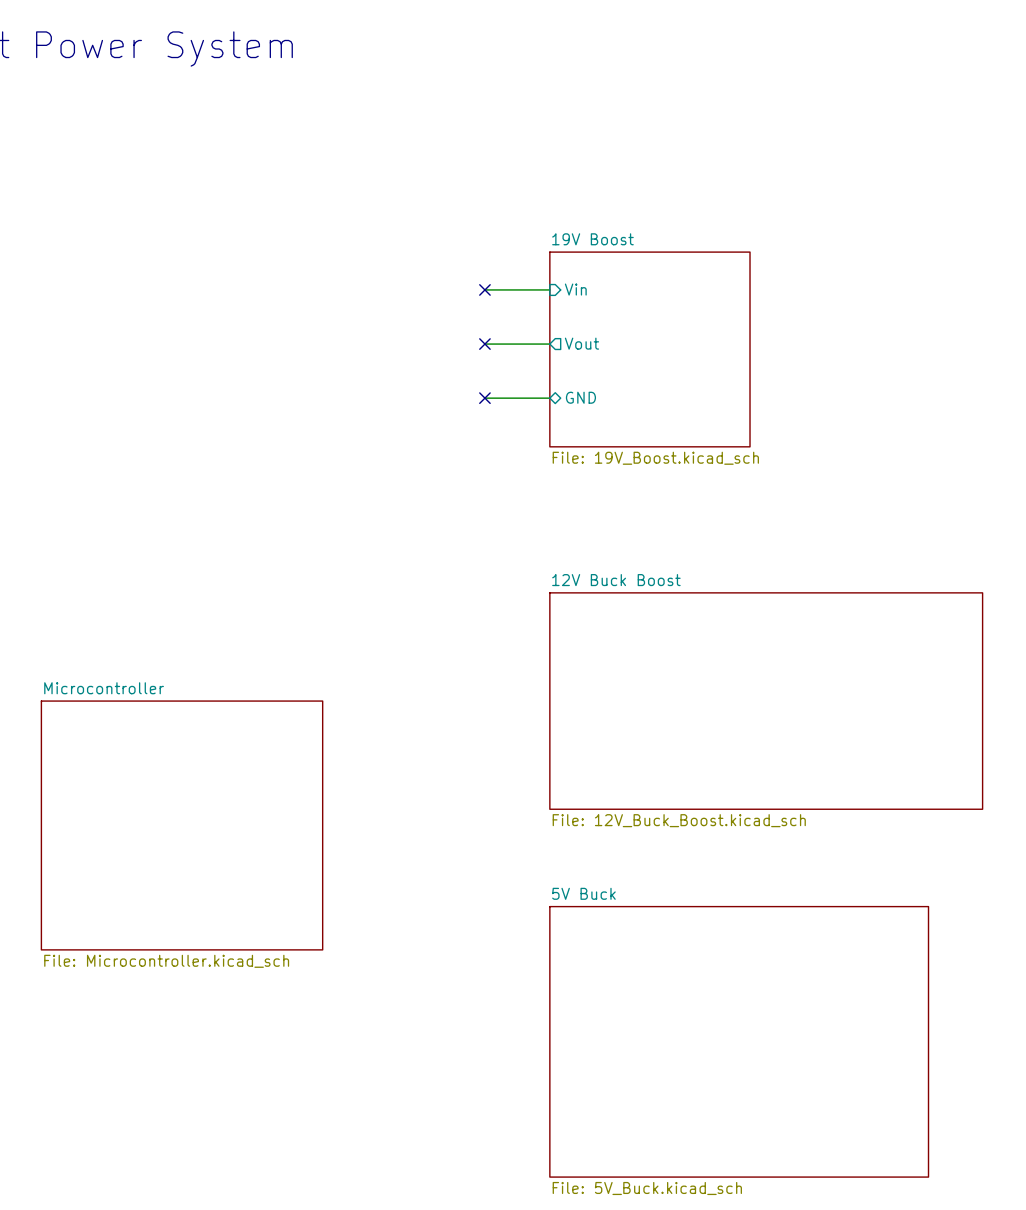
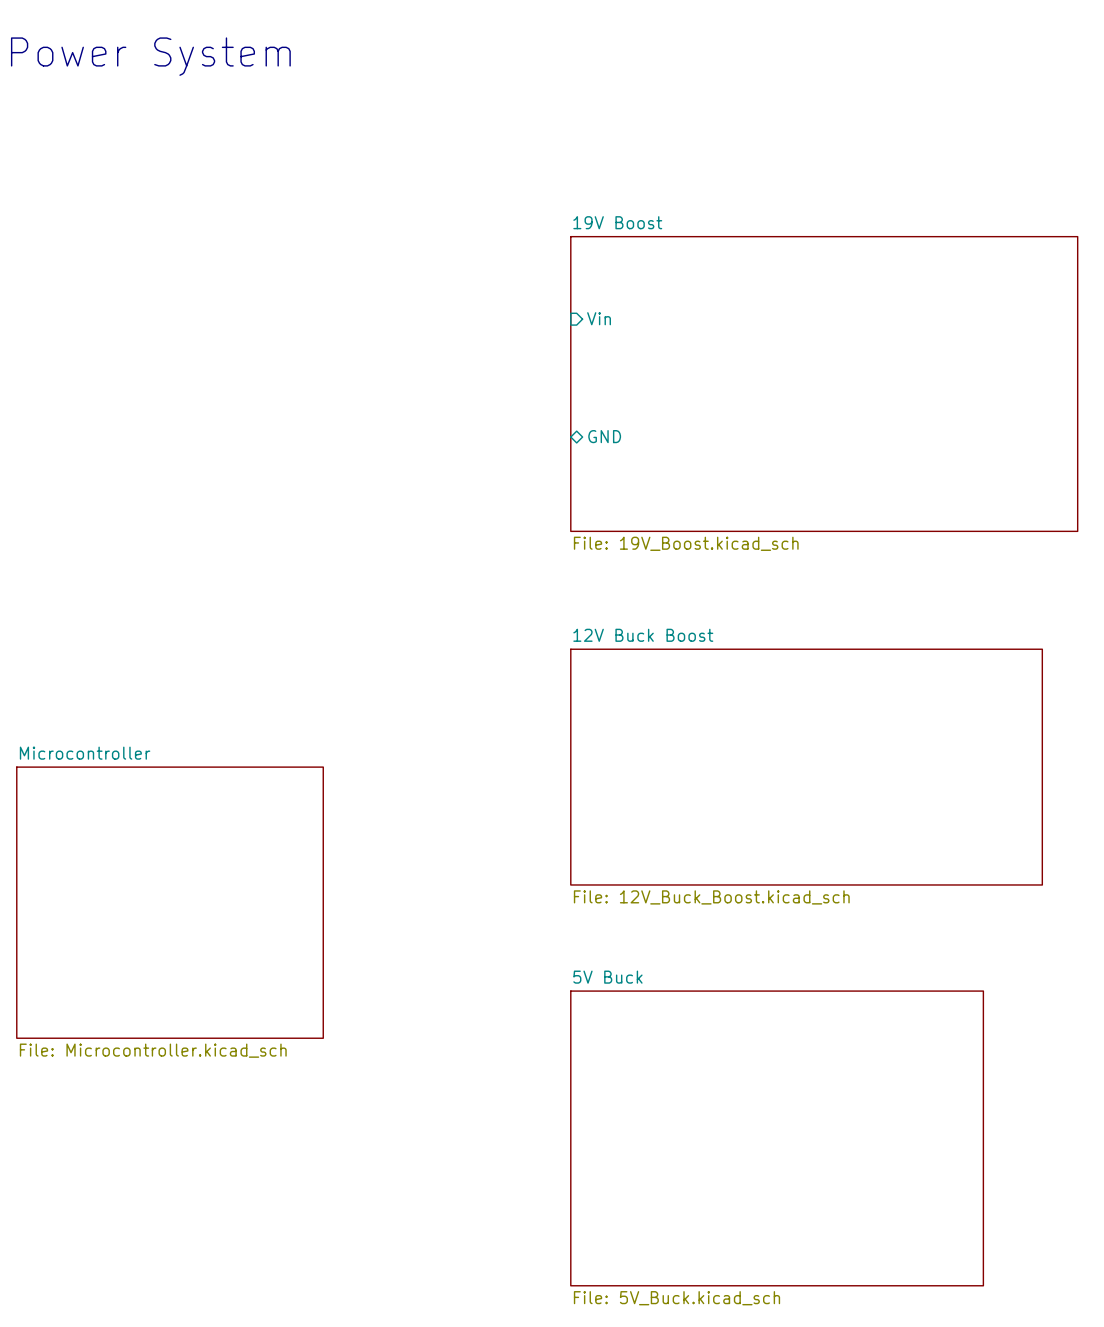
sheet 19V Boost name position: 19V Boost (592, 239) -> 19V Boost (617, 222)
sheet 19V Boost shape: [549, 251, 751, 448] -> [570, 235, 1079, 533]
wire: (484, 289) (549, 289) -> none
no-connect mark: (484, 289) -> none
sheet pin: Vout (581, 343) -> none
wire: (484, 344) (549, 344) -> none
no-connect mark: (484, 344) -> none
wire: (484, 398) (549, 398) -> none
no-connect mark: (484, 398) -> none
sheet 19V Boost value position: File: 19V_Boost.kicad_sch (655, 458) -> File: 19V_Boost.kicad_sch (686, 543)

